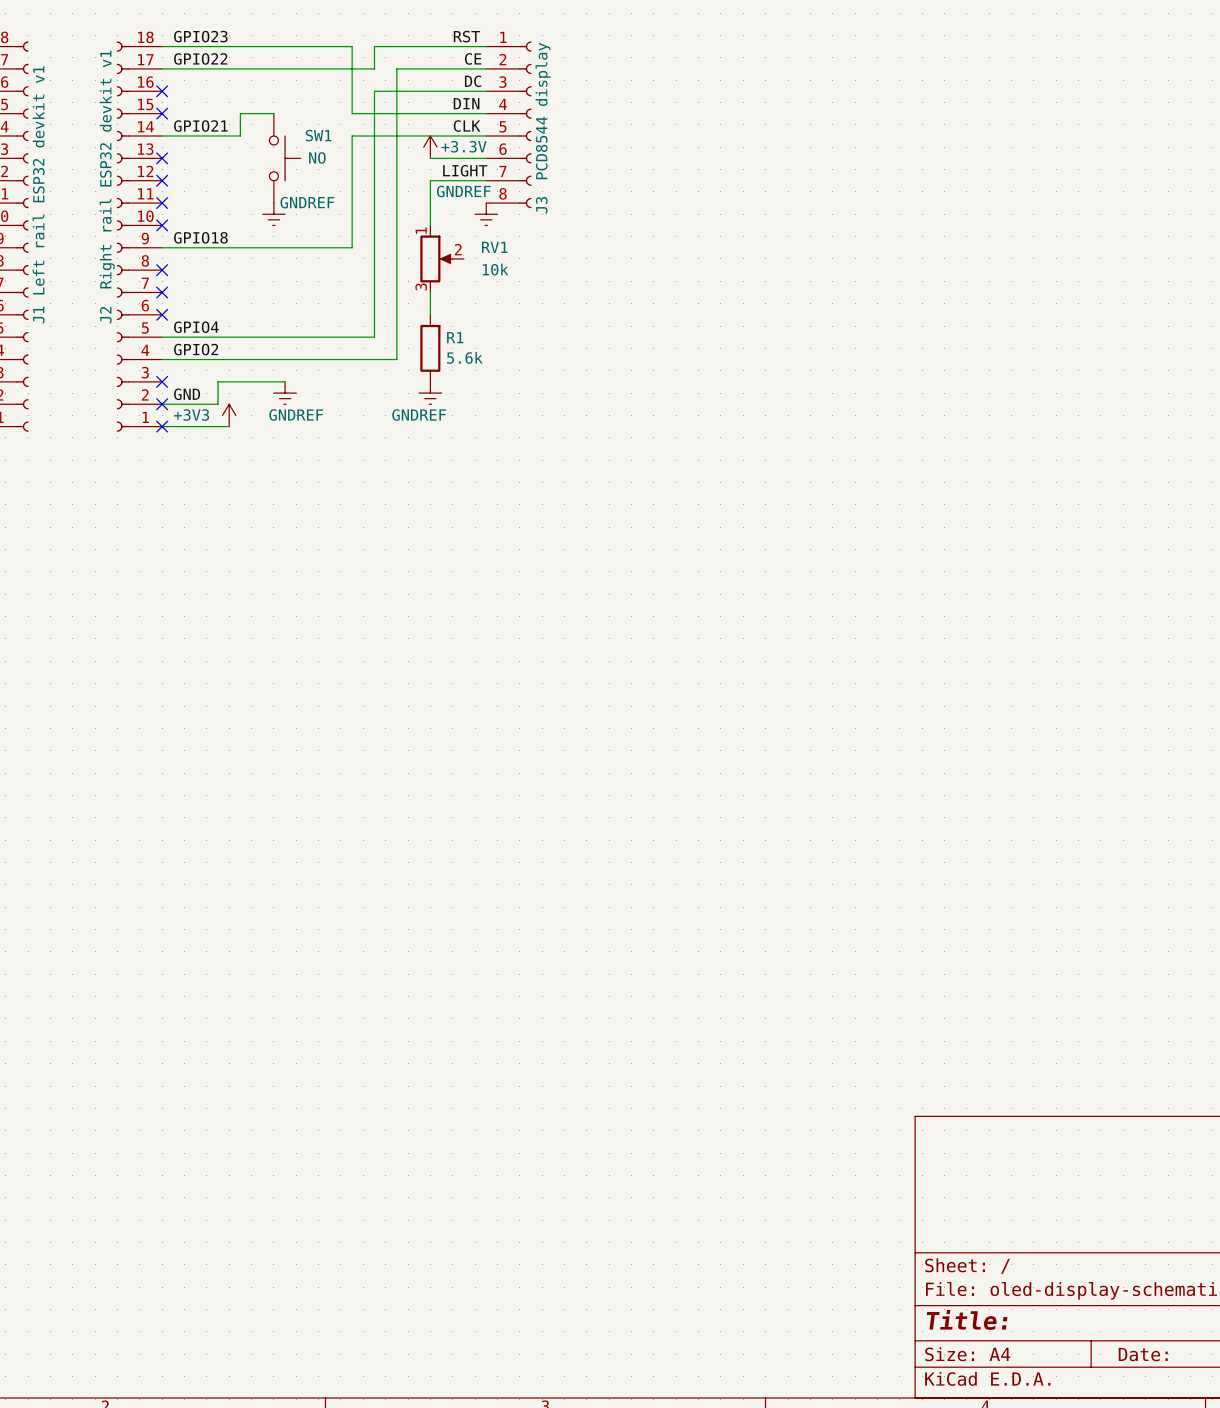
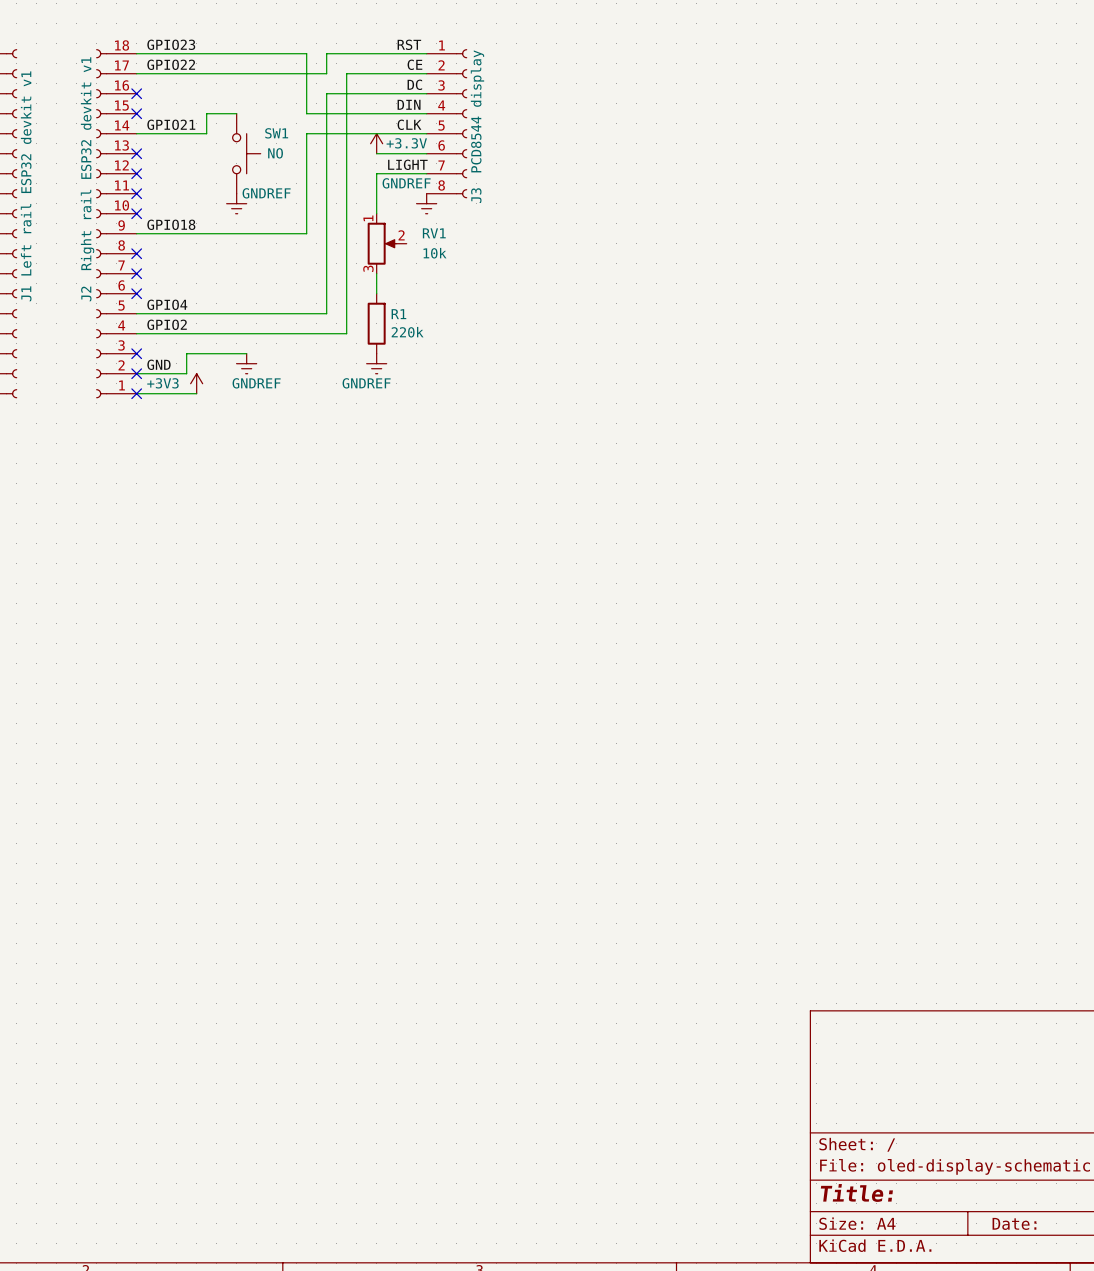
R1 value: 5.6k (464, 357) -> 220k (407, 332)

